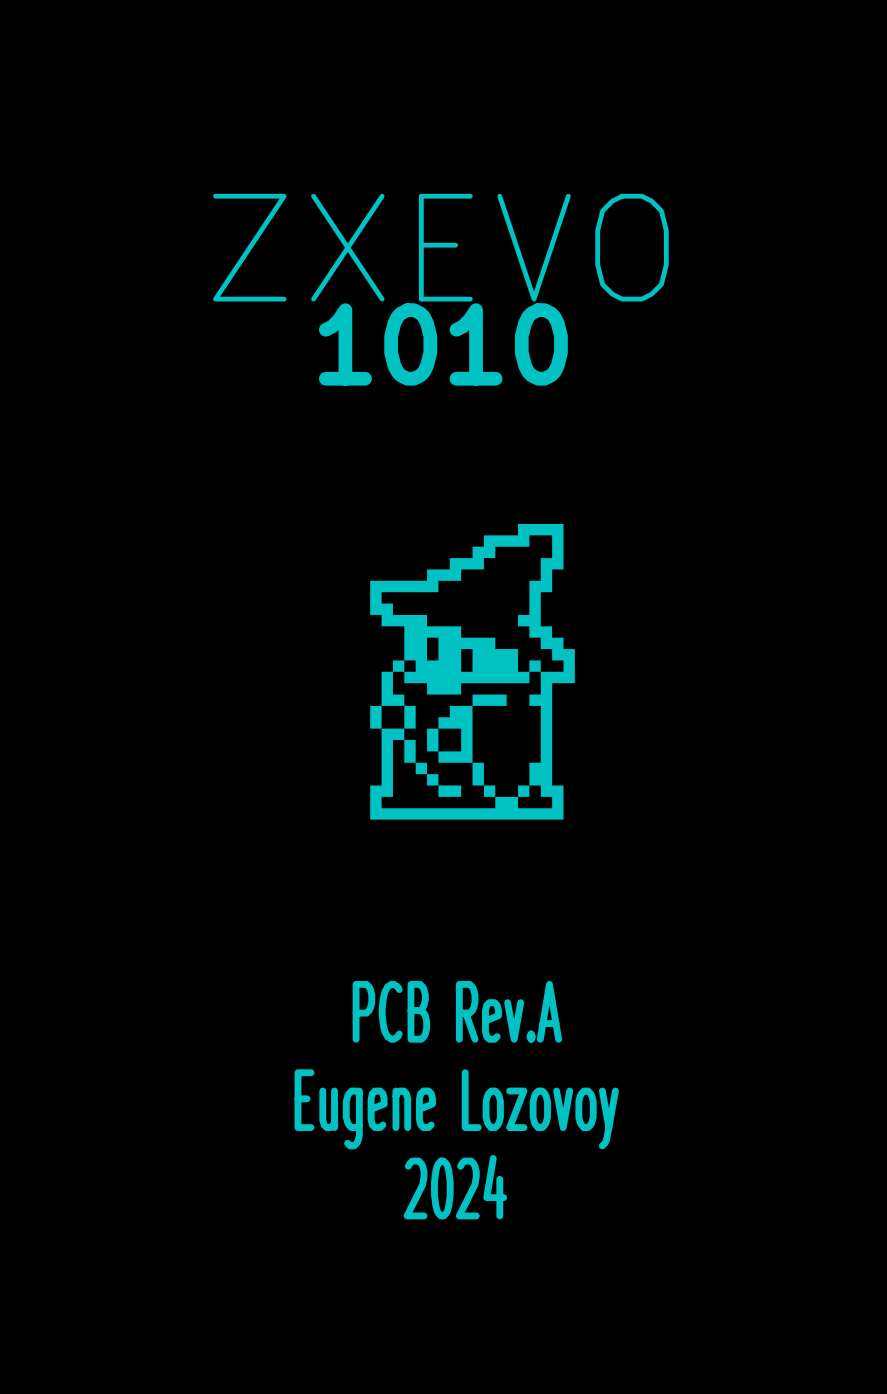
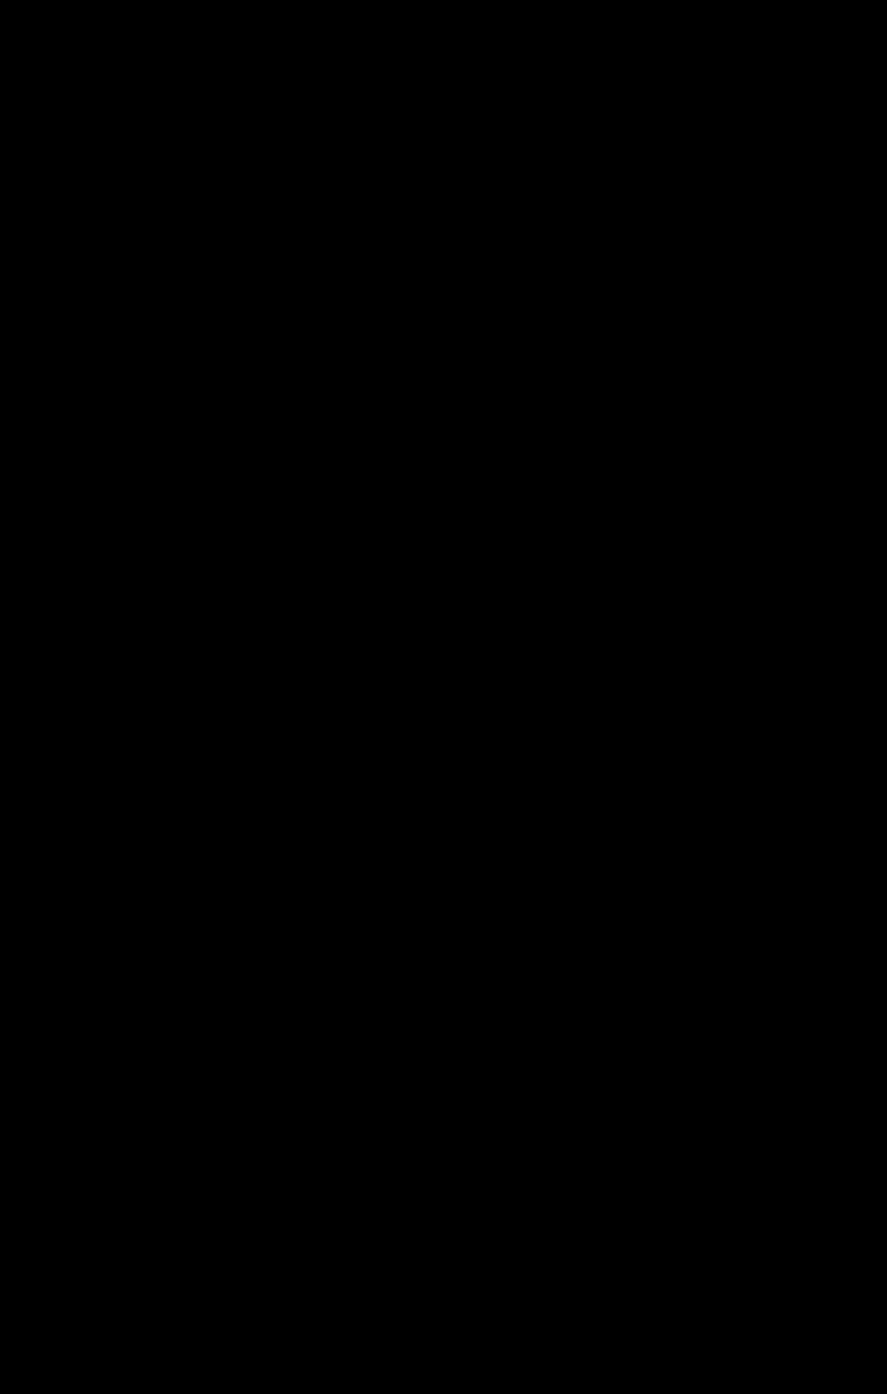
text: ZXEVO (440, 247) -> none
text: 1010 (443, 344) -> none
drawing: [370, 523, 575, 820] -> none
text: PCB Rev.A (457, 1011) -> none
text: Eugene Lozovoy (456, 1109) -> none
text: 2024 (455, 1187) -> none

